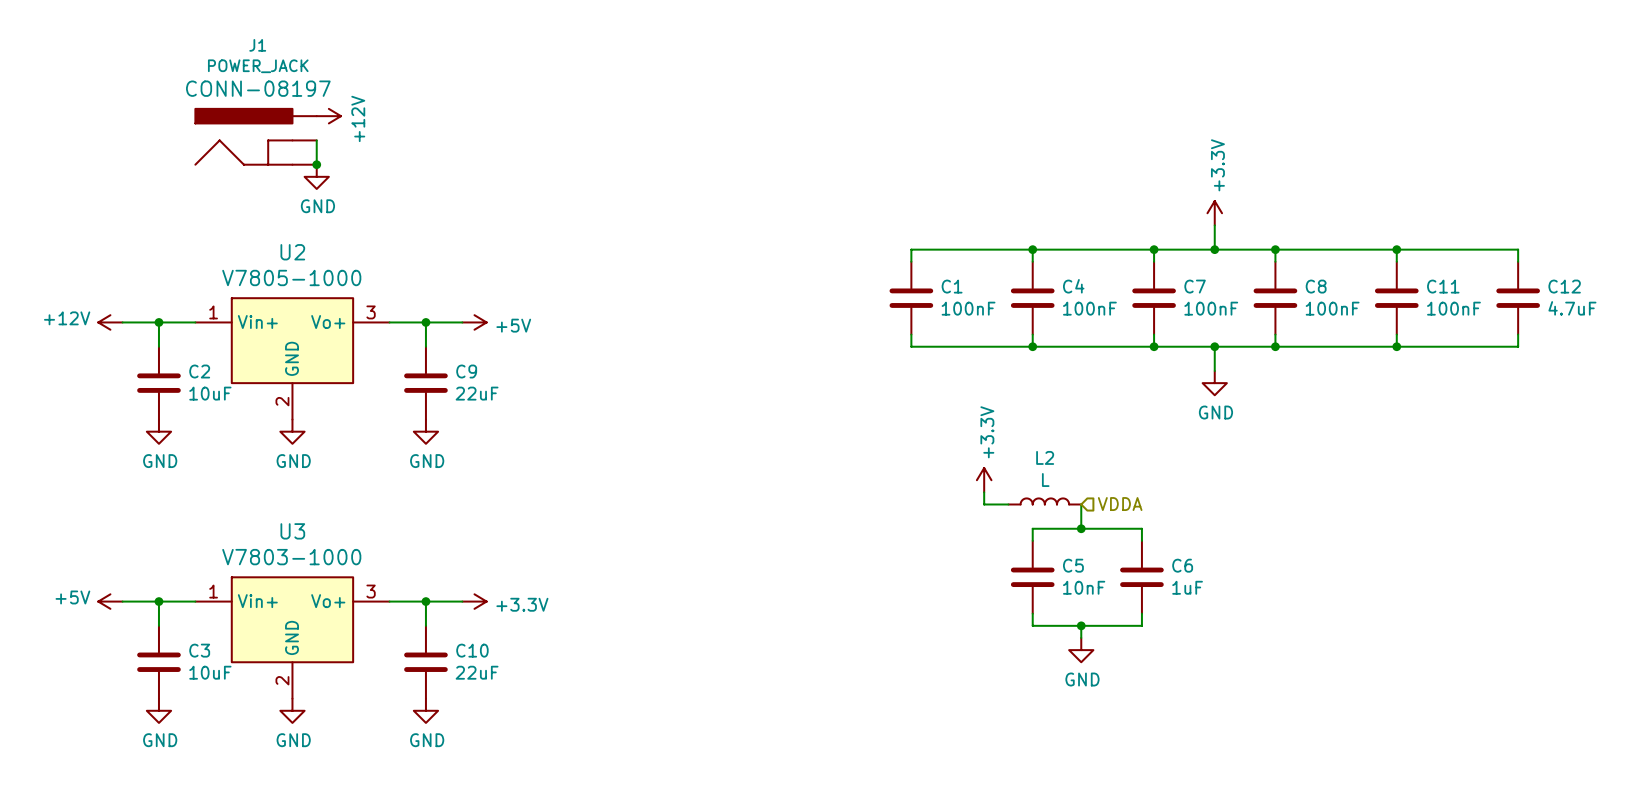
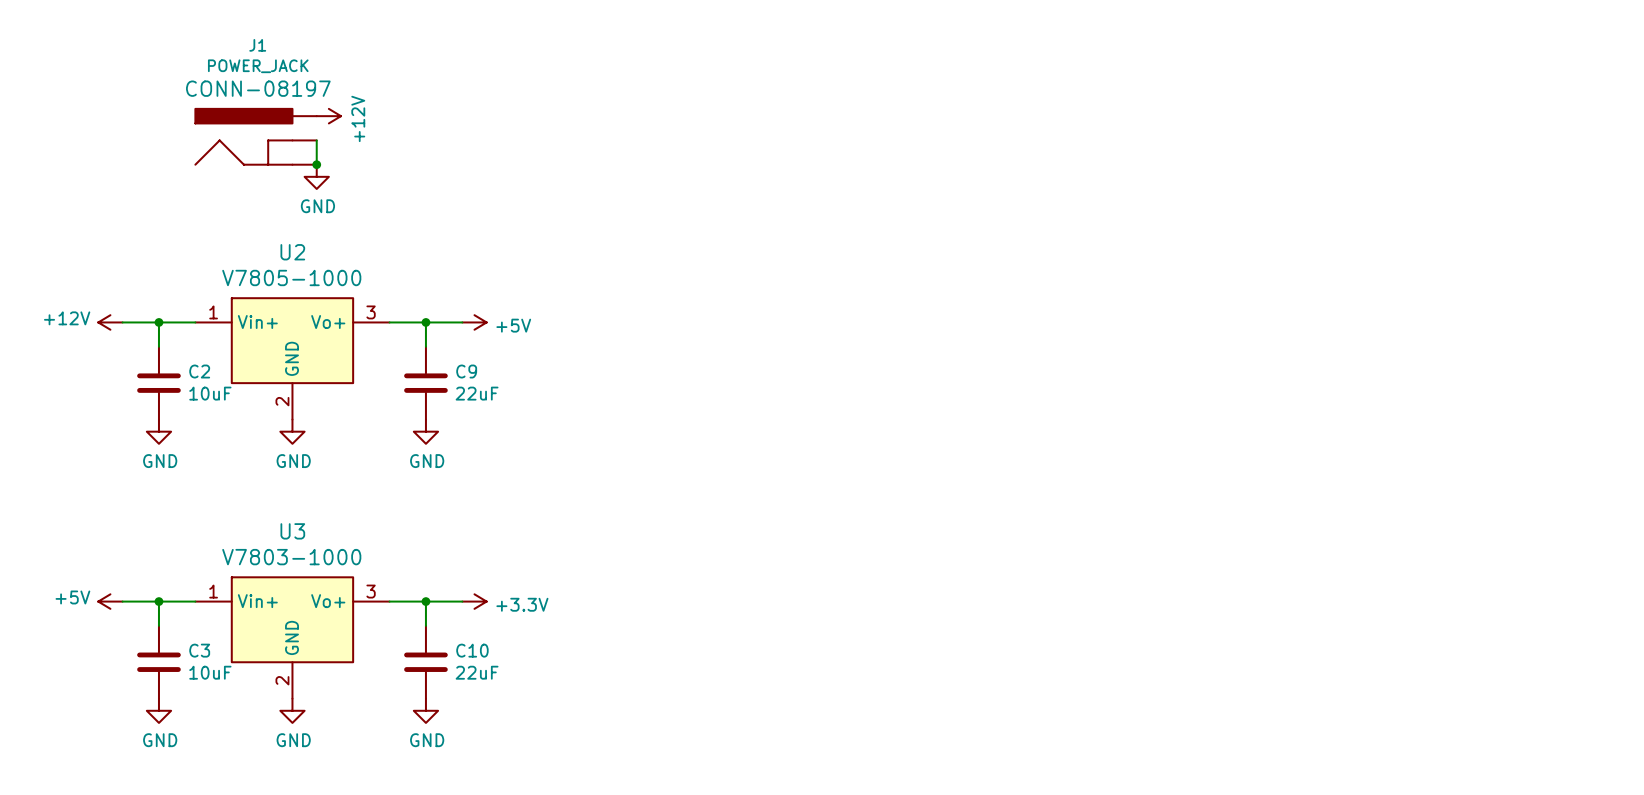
power symbol: +3.3V (1214, 213) -> none
wire: (1214, 225) (1214, 249) -> none
wire: (1032, 249) (1032, 261) -> none
junction: (1032, 249) -> none
wire: (1154, 249) (1154, 261) -> none
junction: (1154, 249) -> none
junction: (1214, 249) -> none
wire: (1275, 249) (1275, 261) -> none
junction: (1275, 249) -> none
wire: (1396, 249) (1396, 261) -> none
junction: (1396, 249) -> none
wire: (911, 261) (911, 249) (1518, 249) (1518, 261) -> none
C1: 100nF (911, 298) -> none
C4: 100nF (1032, 298) -> none
C7: 100nF (1154, 298) -> none
C8: 100nF (1275, 298) -> none
C11: 100nF (1396, 298) -> none
C12: 4.7uF (1518, 298) -> none
wire: (911, 334) (911, 346) (1518, 346) (1518, 334) -> none
wire: (1032, 334) (1032, 346) -> none
wire: (1154, 334) (1154, 346) -> none
wire: (1275, 334) (1275, 346) -> none
wire: (1396, 334) (1396, 346) -> none
junction: (1032, 346) -> none
junction: (1154, 346) -> none
wire: (1214, 346) (1214, 371) -> none
junction: (1214, 346) -> none
junction: (1275, 346) -> none
junction: (1396, 346) -> none
power symbol: GND (1214, 383) -> none
power symbol: +3.3V (984, 480) -> none
wire: (984, 492) (984, 504) (1008, 504) -> none
L2: L (1044, 501) -> none
wire: (1081, 504) (1081, 528) -> none
hierarchical label: VDDA (1120, 504) -> none
junction: (1081, 528) -> none
wire: (1032, 540) (1032, 528) (1141, 528) (1141, 540) -> none
C5: 10nF (1032, 577) -> none
C6: 1uF (1141, 577) -> none
wire: (1032, 613) (1032, 625) (1141, 625) (1141, 613) -> none
wire: (1081, 625) (1081, 637) -> none
junction: (1081, 625) -> none
power symbol: GND (1081, 650) -> none

